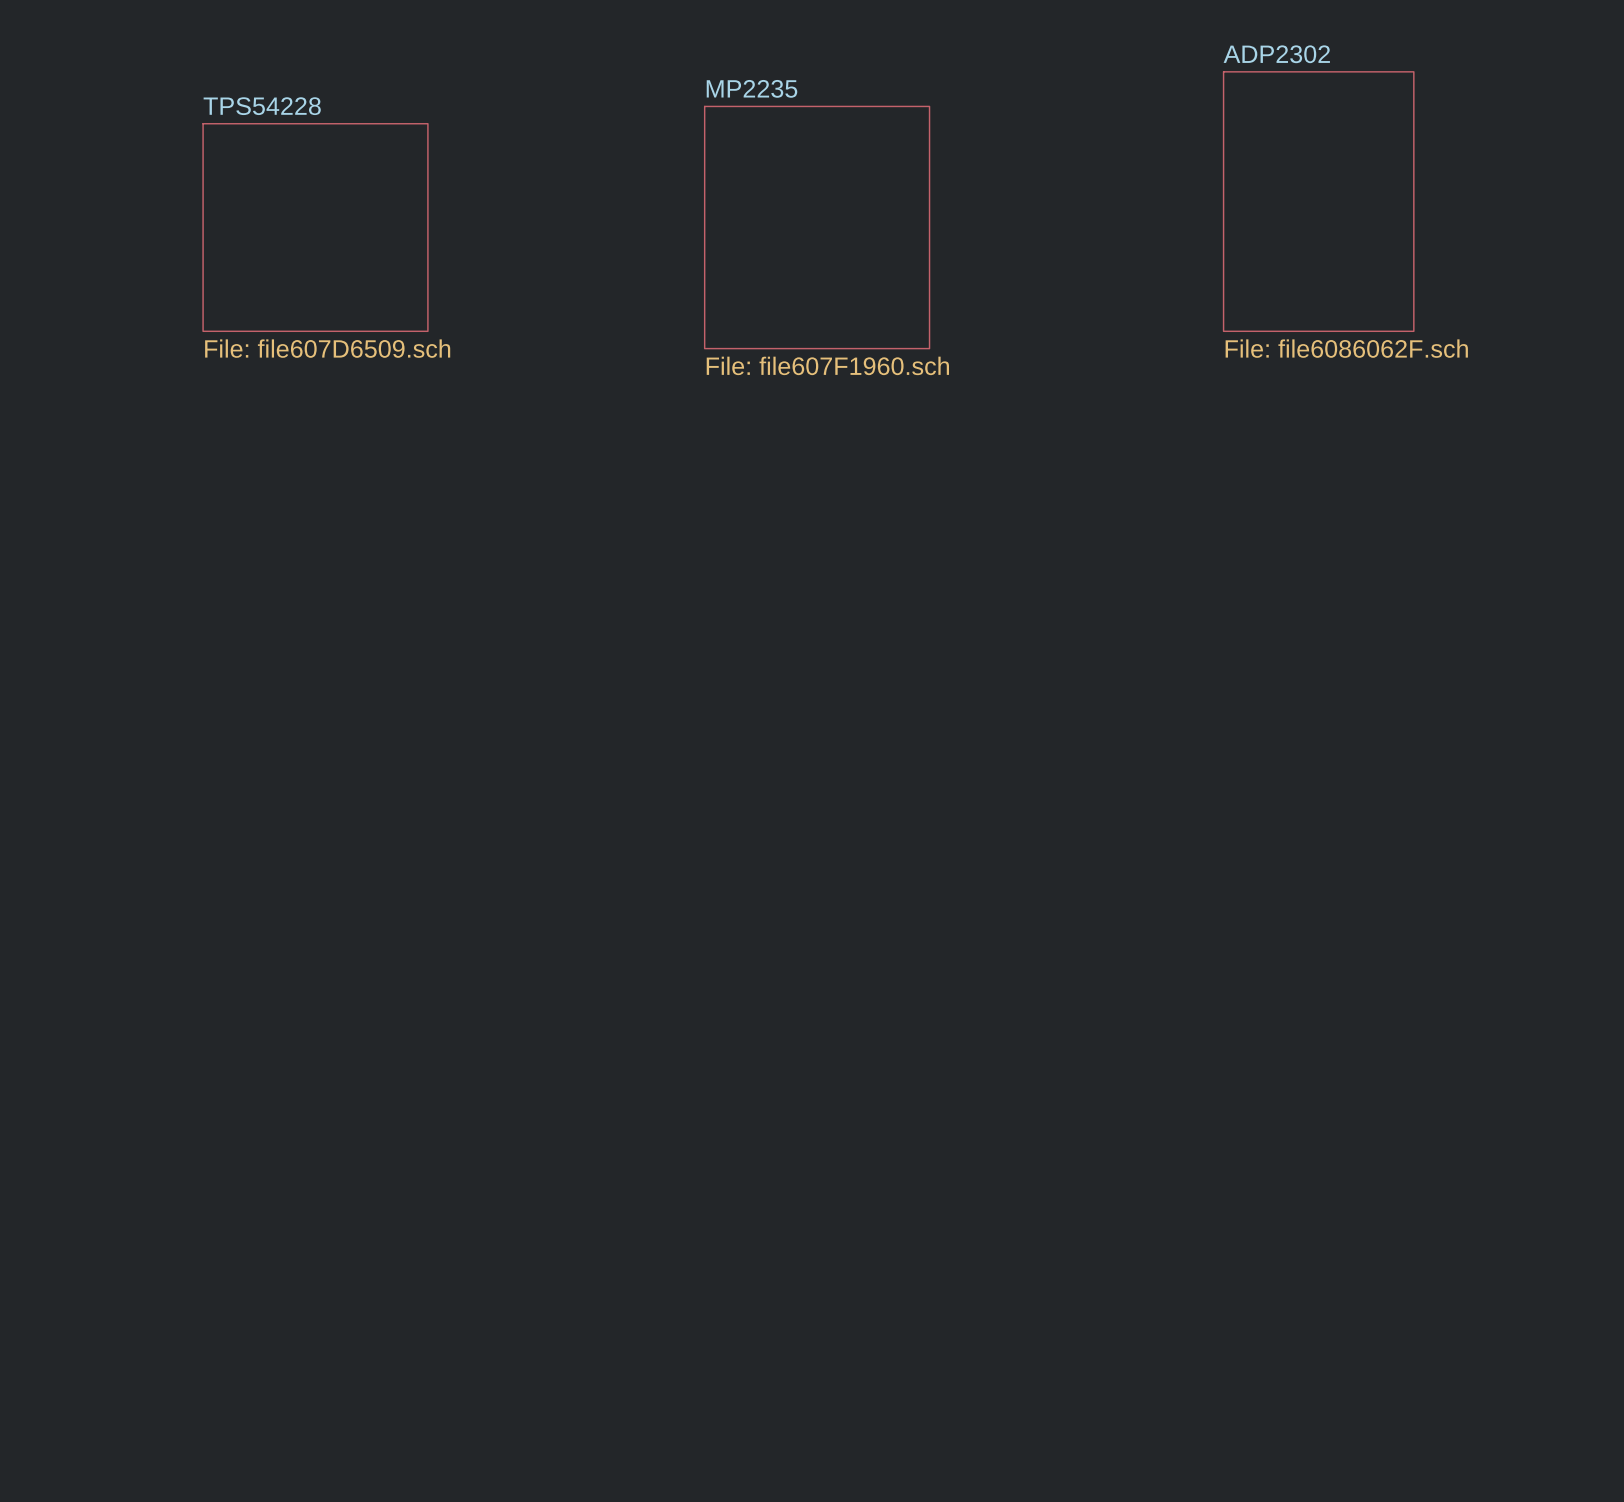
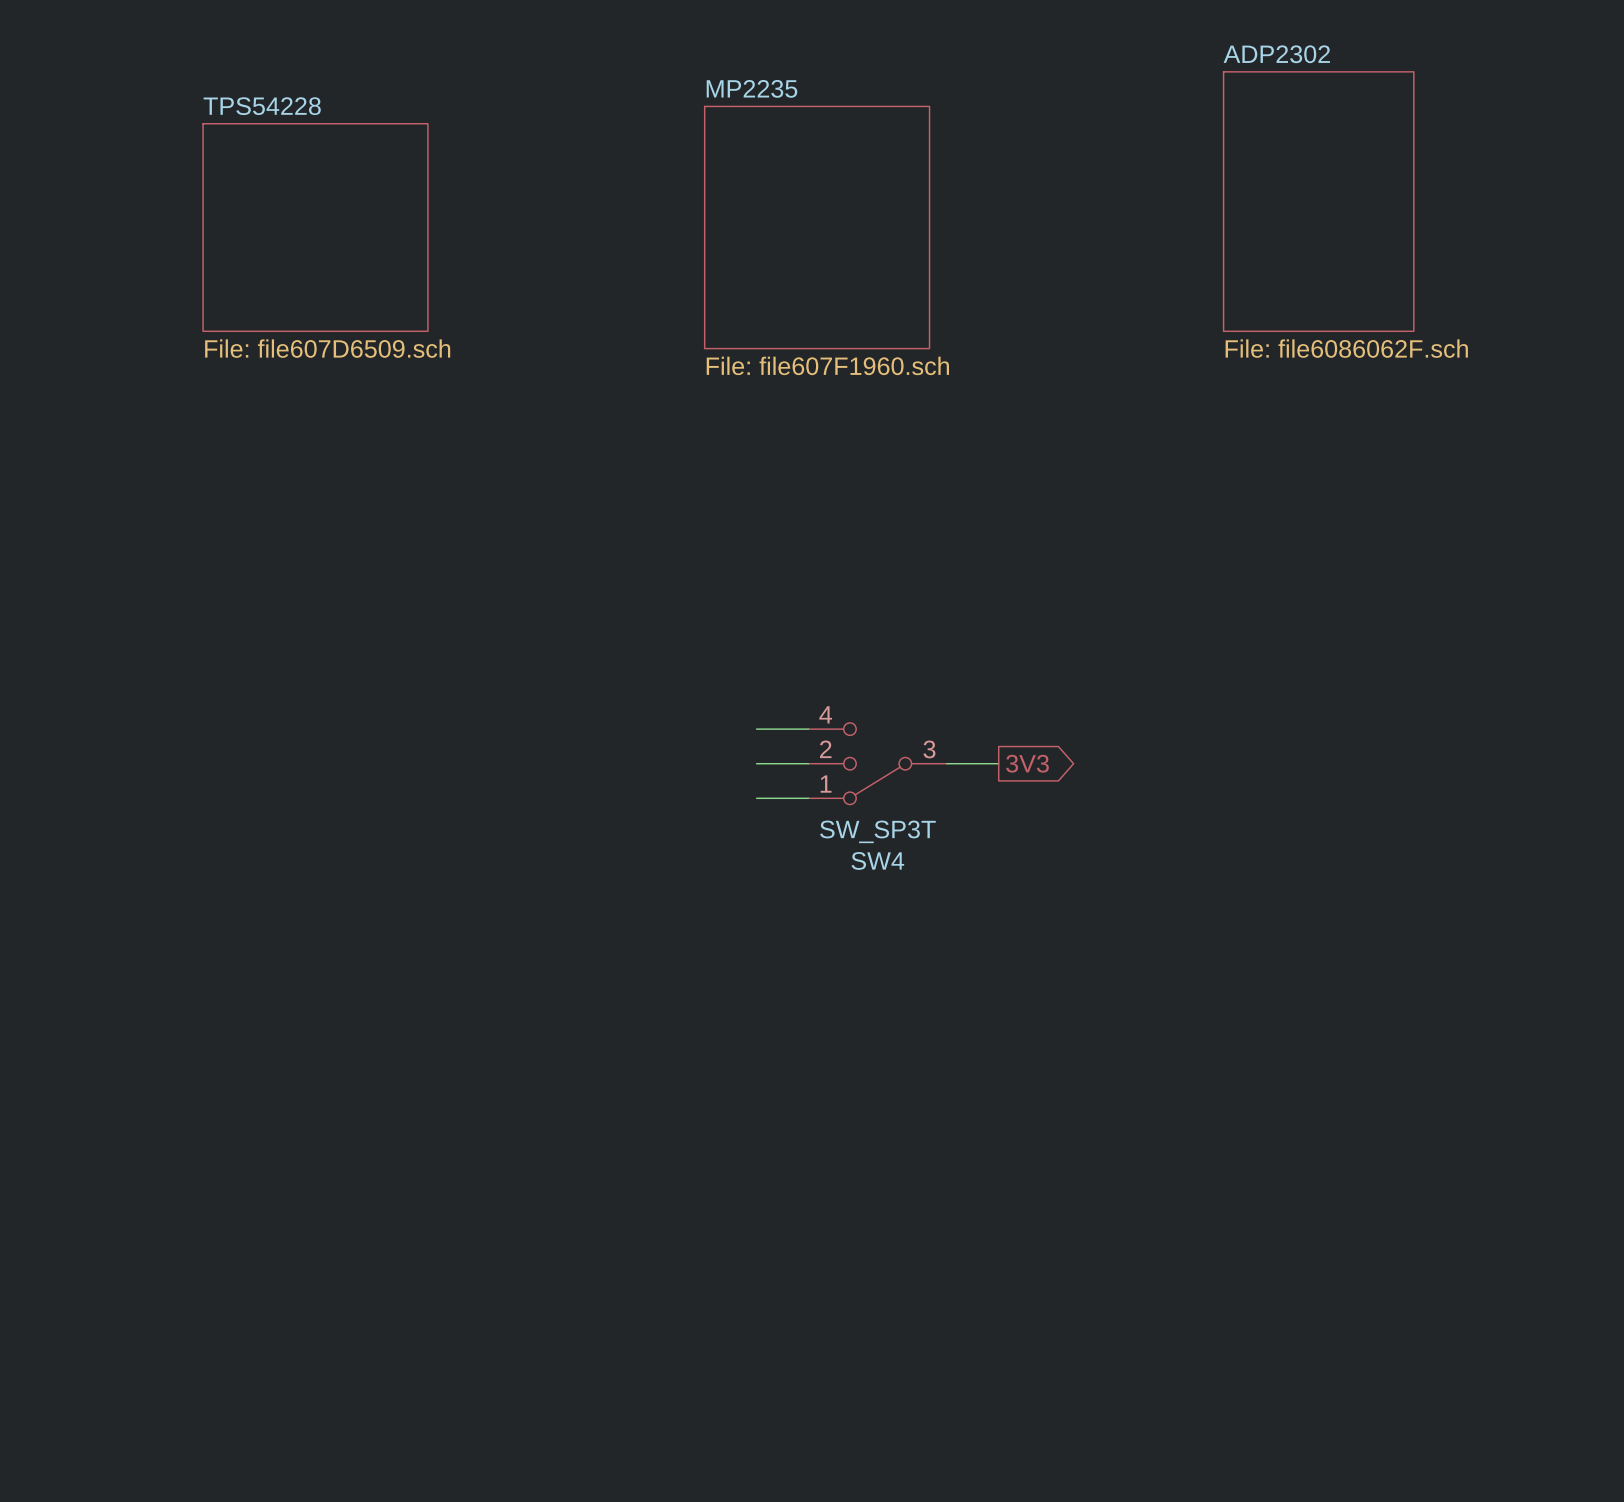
wire: none -> (756, 729) (808, 729)
wire: none -> (756, 763) (808, 763)
SW4: none -> SW_SP3T (877, 763)
wire: none -> (946, 763) (998, 763)
global label: none -> 3V3 (1027, 763)
wire: none -> (756, 798) (808, 798)

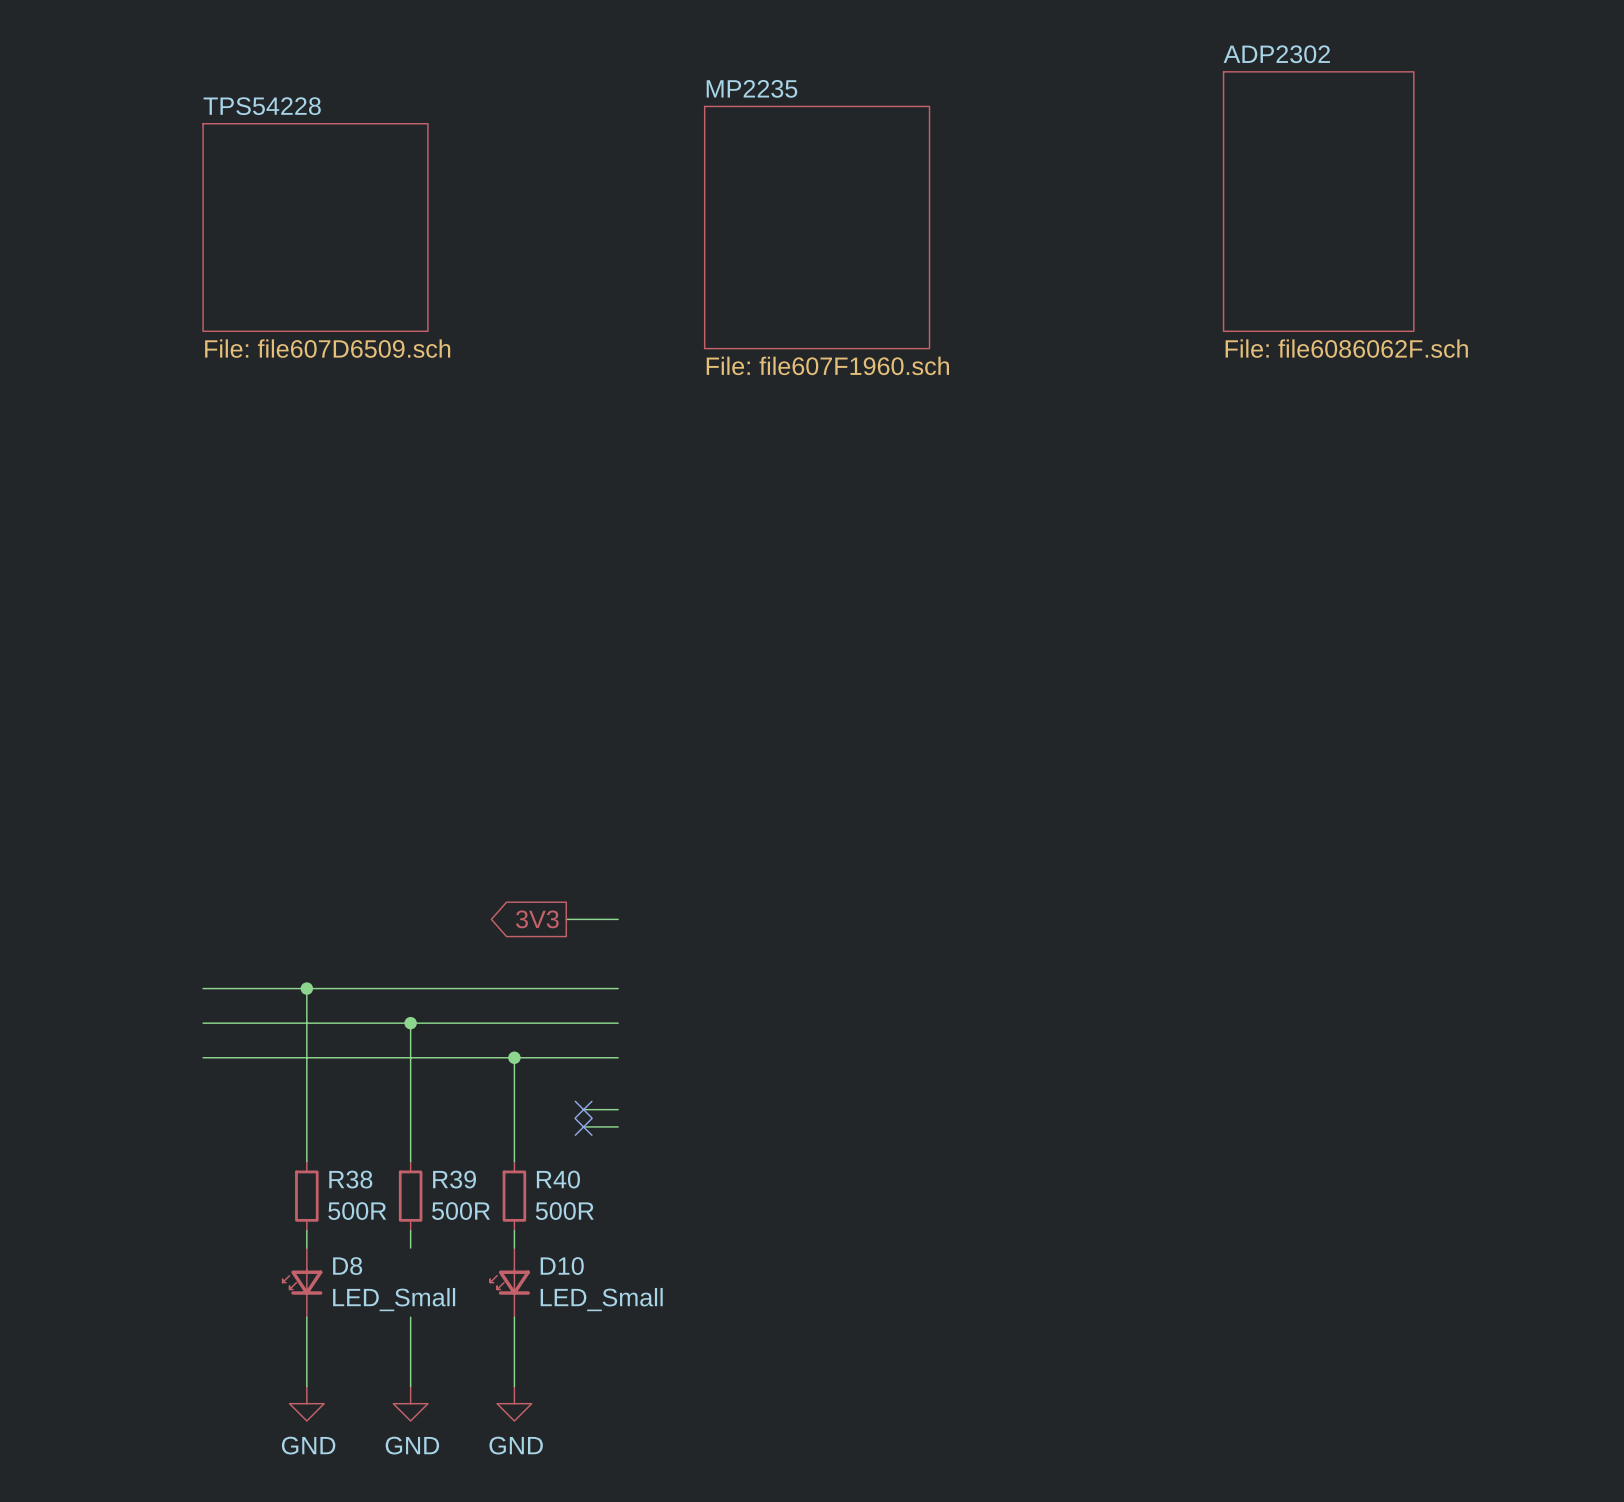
wire: (756, 729) (808, 729) -> none
wire: (756, 763) (808, 763) -> none
SW4: SW_SP3T (877, 763) -> none
wire: (946, 763) (998, 763) -> none
global label: 3V3 (1027, 763) -> none
wire: (756, 798) (808, 798) -> (566, 919) (618, 919)
global label: none -> 3V3 (537, 919)
wire: none -> (203, 988) (618, 988)
wire: none -> (306, 988) (306, 1161)
junction: none -> (306, 988)
wire: none -> (203, 1023) (618, 1023)
wire: none -> (410, 1023) (410, 1161)
junction: none -> (410, 1023)
wire: none -> (203, 1057) (618, 1057)
wire: none -> (514, 1057) (514, 1161)
junction: none -> (514, 1057)
wire: none -> (583, 1109) (618, 1109)
no-connect mark: none -> (583, 1109)
wire: none -> (583, 1126) (618, 1126)
no-connect mark: none -> (583, 1126)
R38: none -> 500R (306, 1196)
R39: none -> 500R (410, 1196)
R40: none -> 500R (514, 1196)
wire: none -> (306, 1230) (306, 1248)
wire: none -> (410, 1230) (410, 1248)
wire: none -> (514, 1230) (514, 1248)
D8: none -> LED_Small (302, 1282)
D10: none -> LED_Small (510, 1282)
wire: none -> (306, 1317) (306, 1386)
wire: none -> (410, 1317) (410, 1386)
wire: none -> (514, 1317) (514, 1386)
power symbol: none -> GND (306, 1403)
power symbol: none -> GND (410, 1403)
power symbol: none -> GND (514, 1403)

